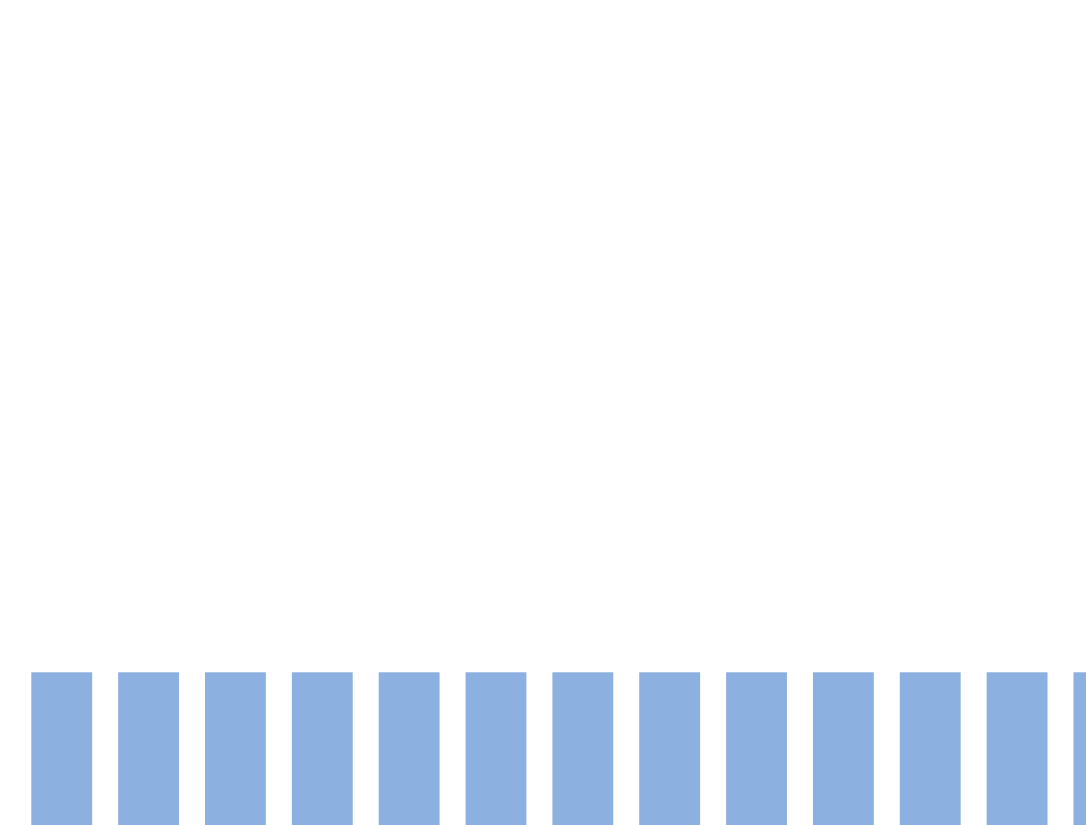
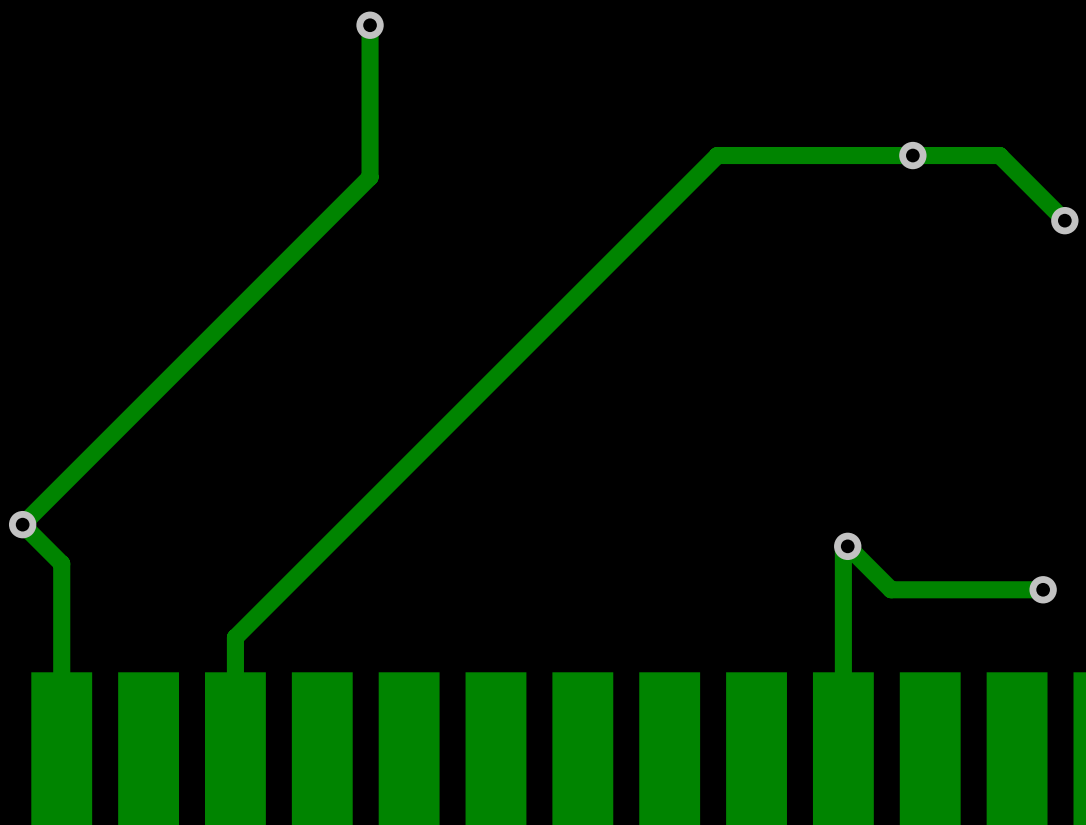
track: none -> (370, 25) (370, 177) (22, 524) (61, 563) (61, 802)
via: none -> (370, 25)
via: none -> (912, 155)
track: none -> (1064, 220) (999, 155) (717, 155) (235, 637) (235, 802)
via: none -> (1064, 220)
via: none -> (22, 524)
via: none -> (847, 546)
track: none -> (1043, 589) (891, 589) (847, 546) (843, 550) (843, 802)
via: none -> (1043, 589)

